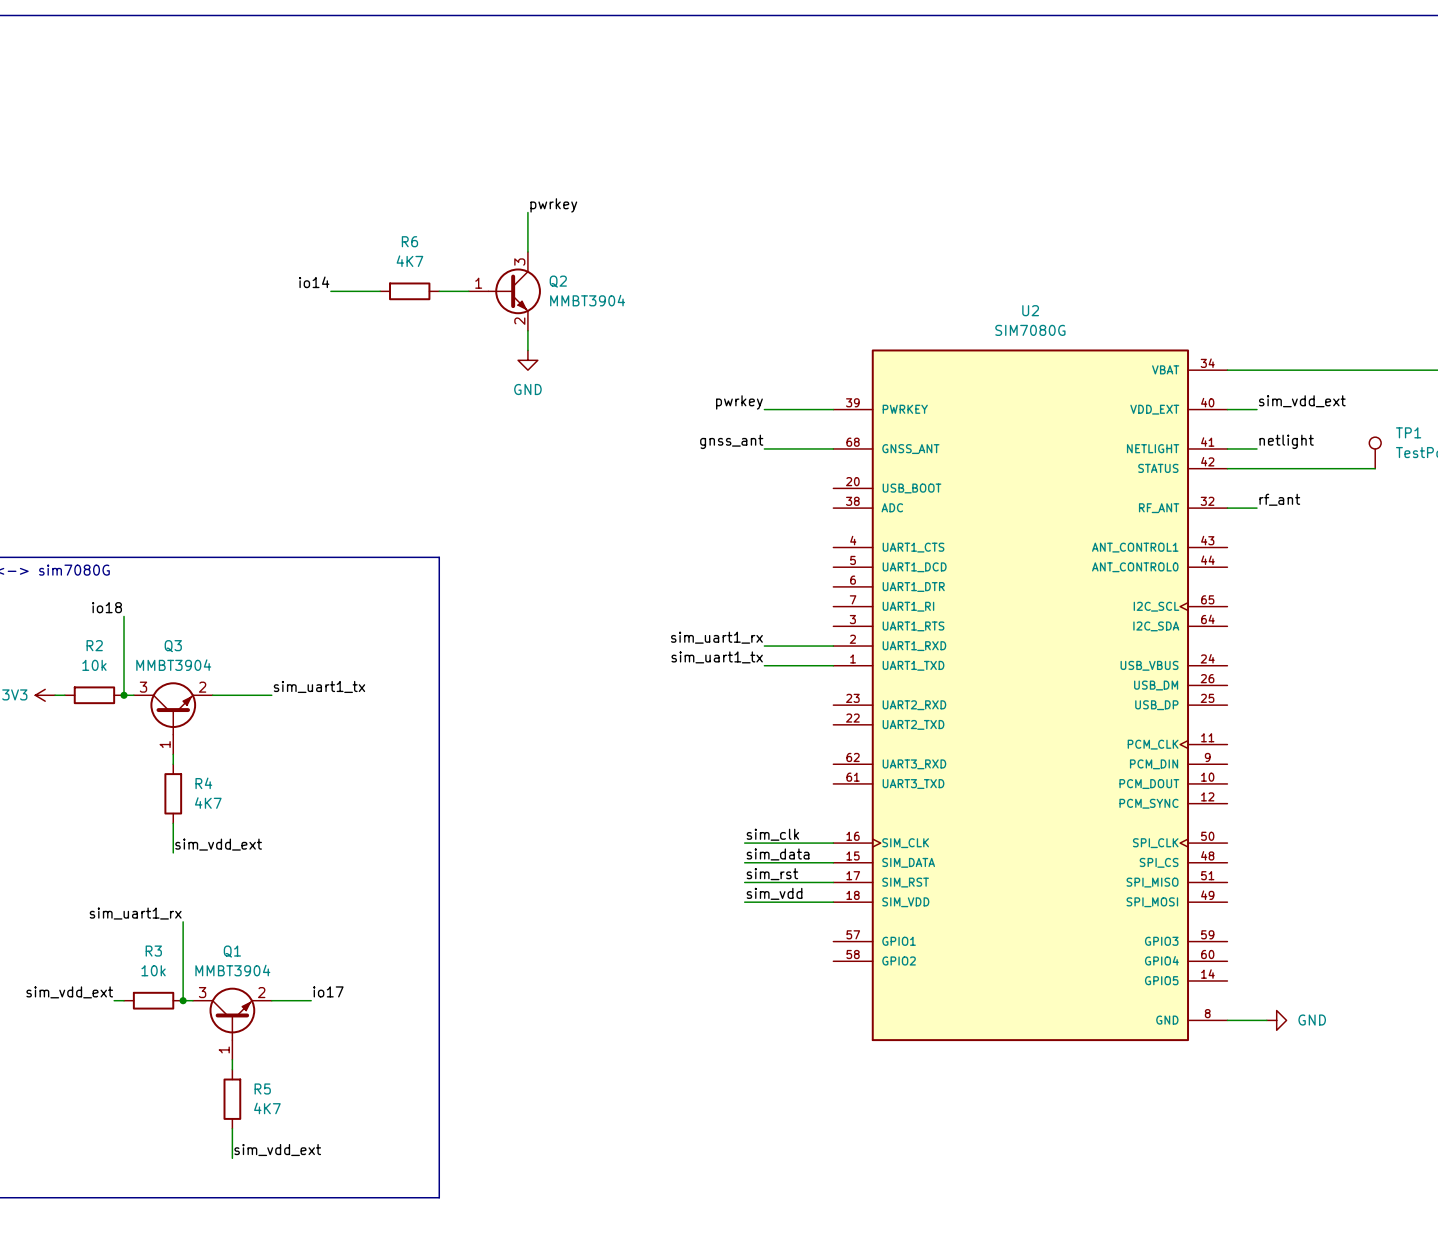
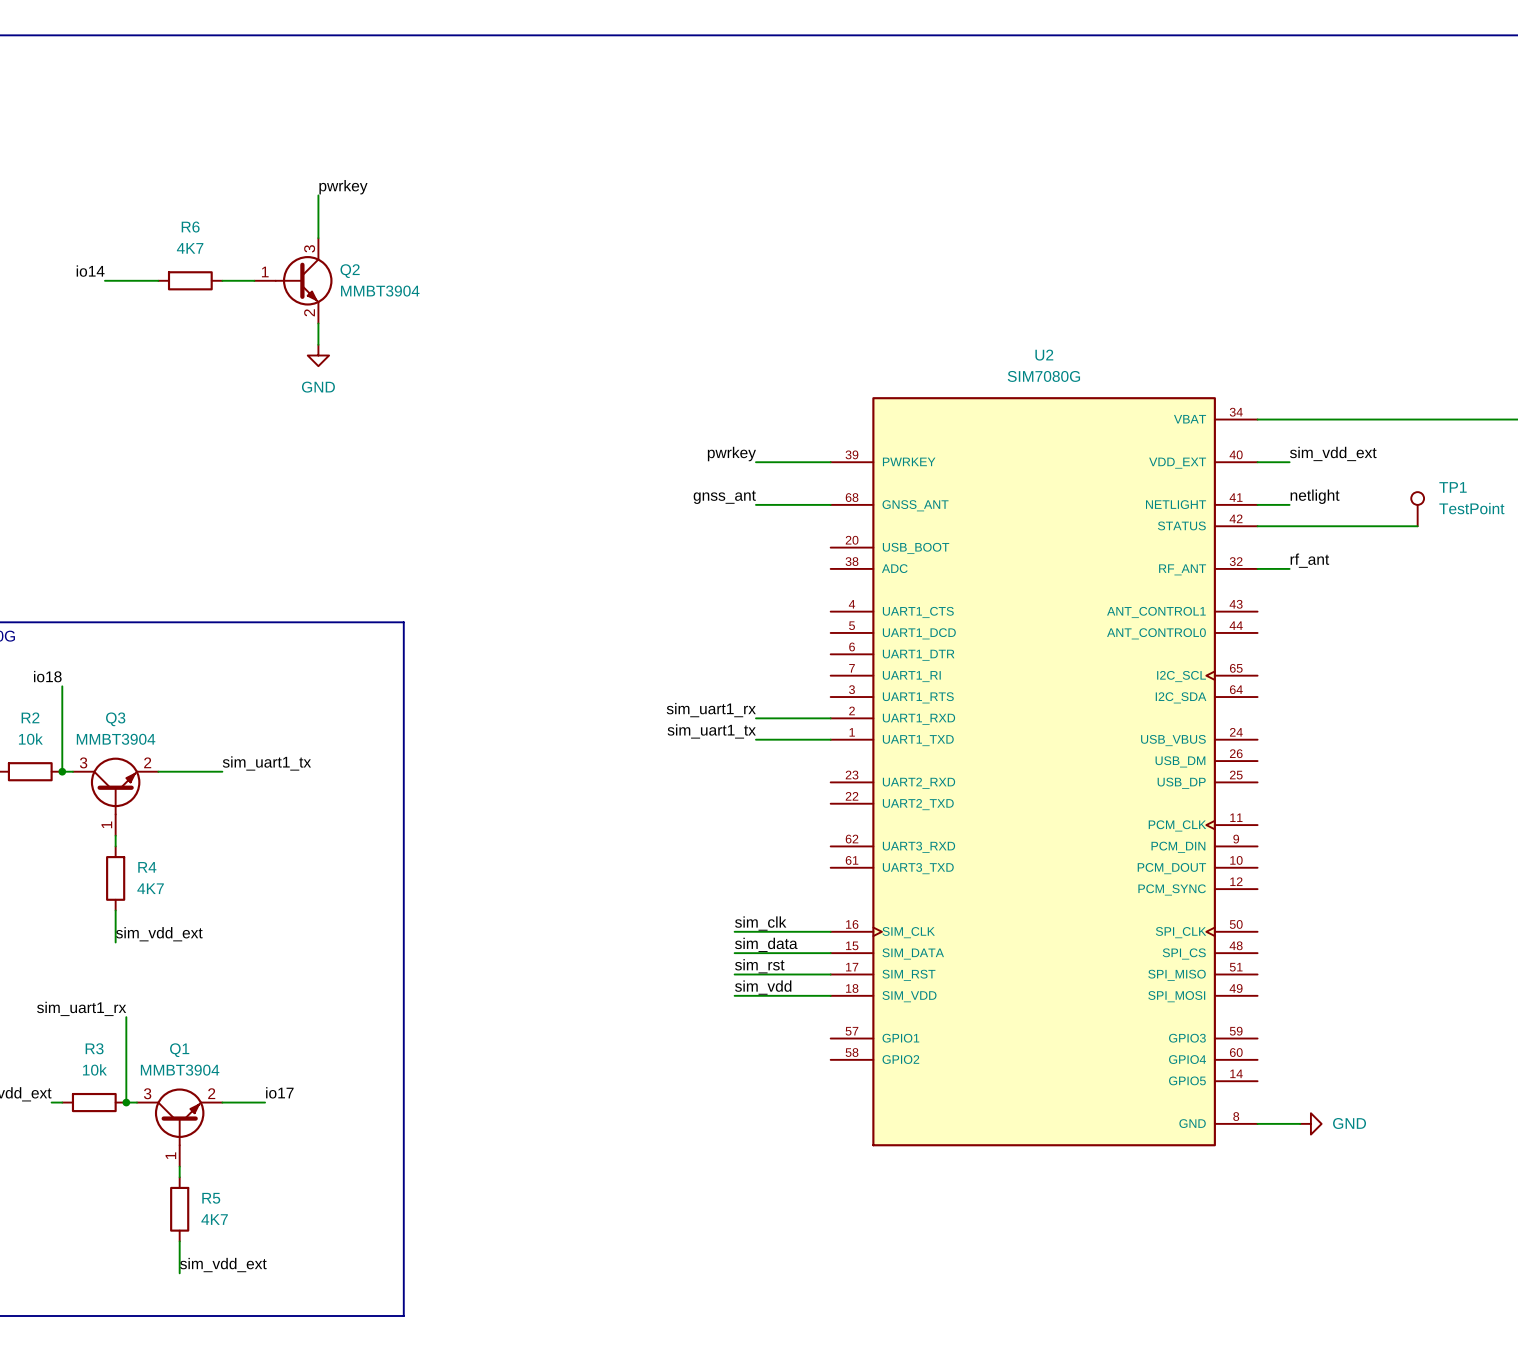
label position: pwrkey (553, 205) -> pwrkey (343, 187)
wire: (527, 212) (527, 251) -> (318, 195) (318, 238)
label position: io14 (314, 282) -> io14 (90, 271)
wire: (330, 291) (380, 291) -> (104, 280) (158, 280)
R6 position: (409, 291) -> (190, 280)
wire: (439, 291) (468, 291) -> (222, 280) (254, 280)
Q2 position: (504, 291) -> (293, 280)
wire: (527, 330) (527, 350) -> (318, 323) (318, 344)
power symbol position: GND (527, 360) -> GND (318, 355)

